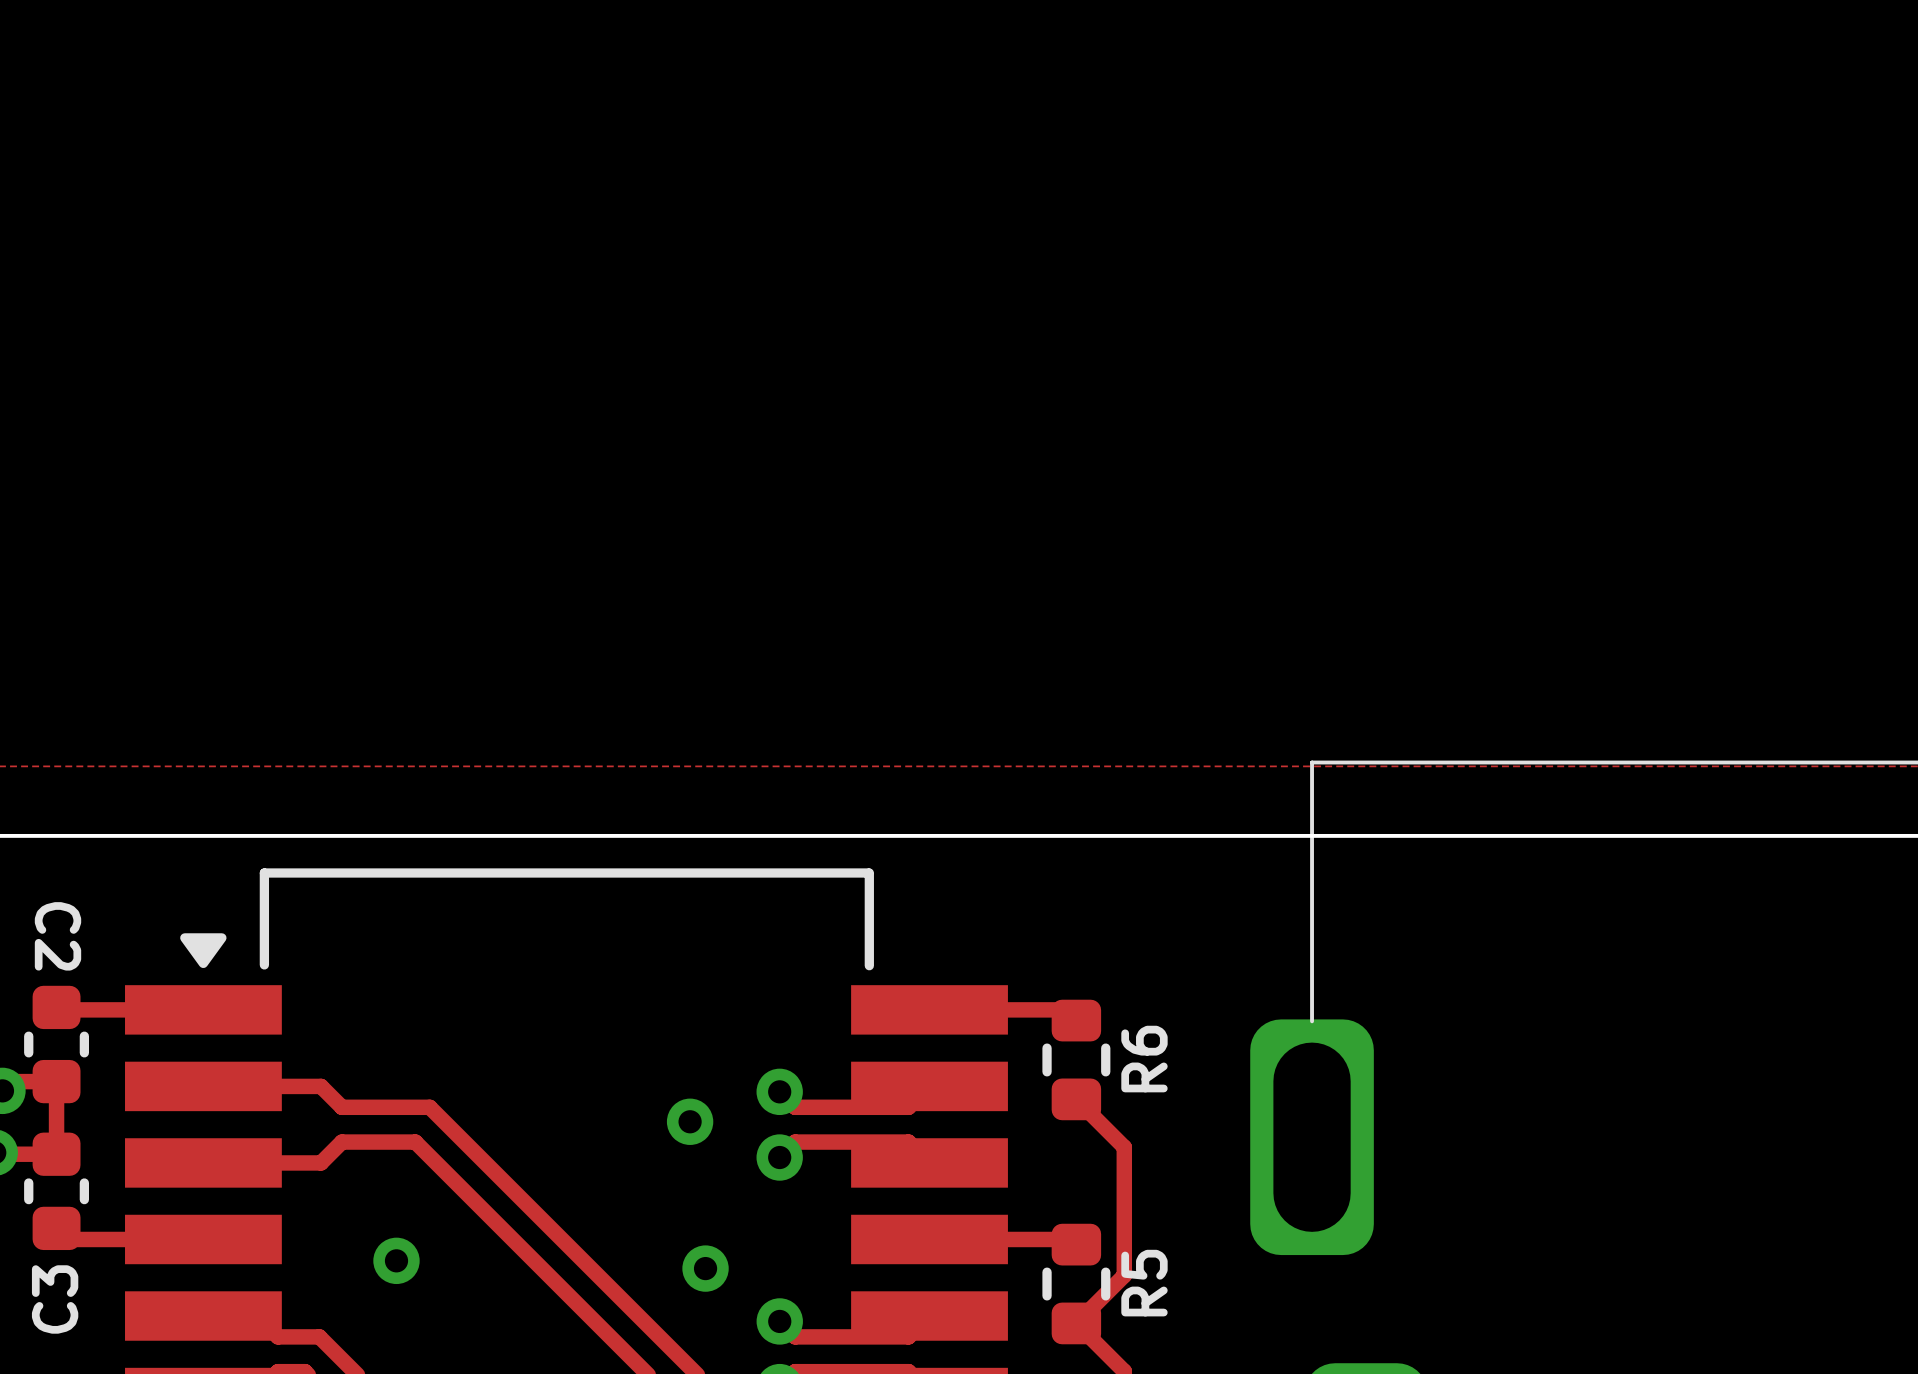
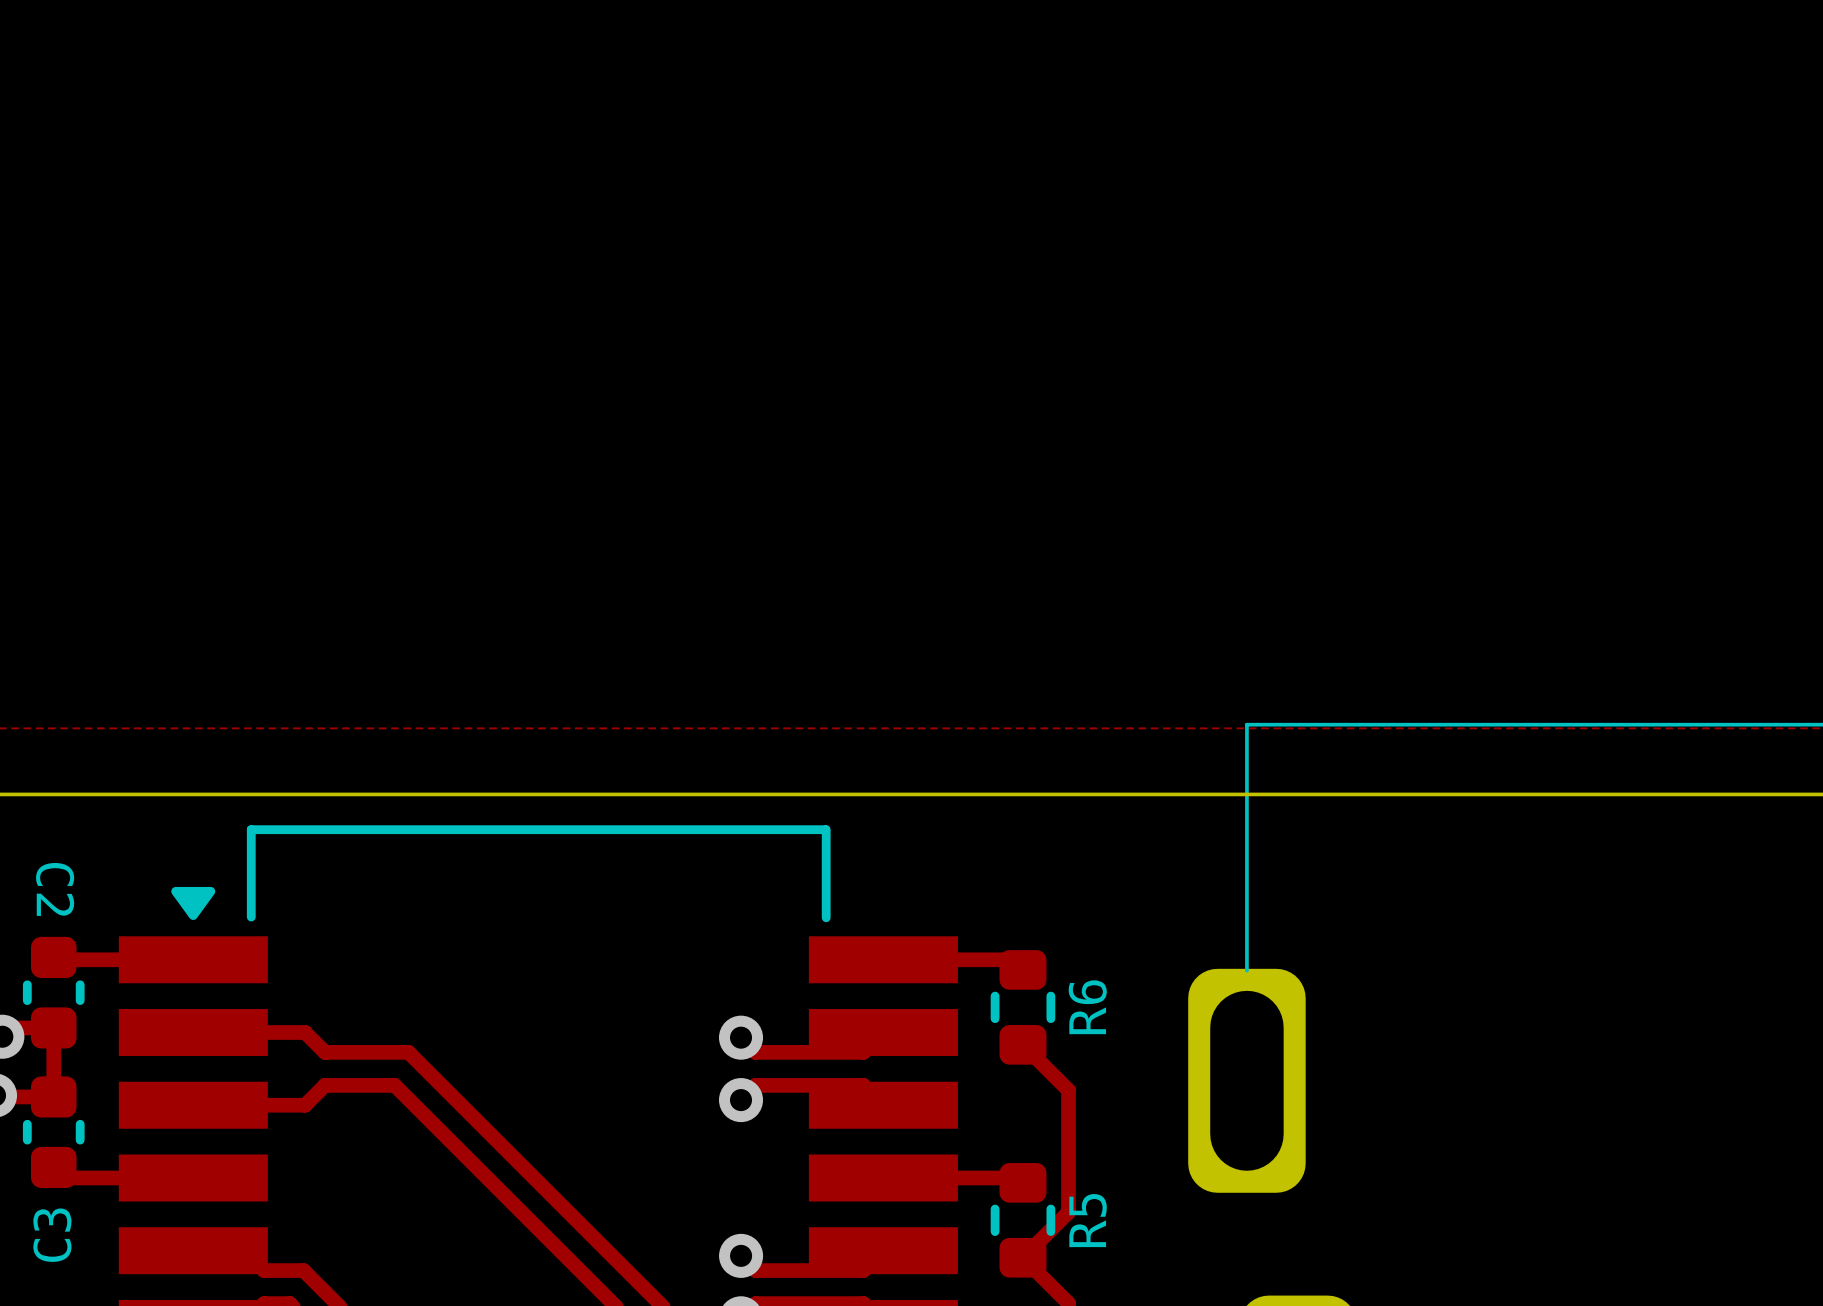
via: (690, 1121) -> none
via: (396, 1260) -> none
via: (705, 1268) -> none

